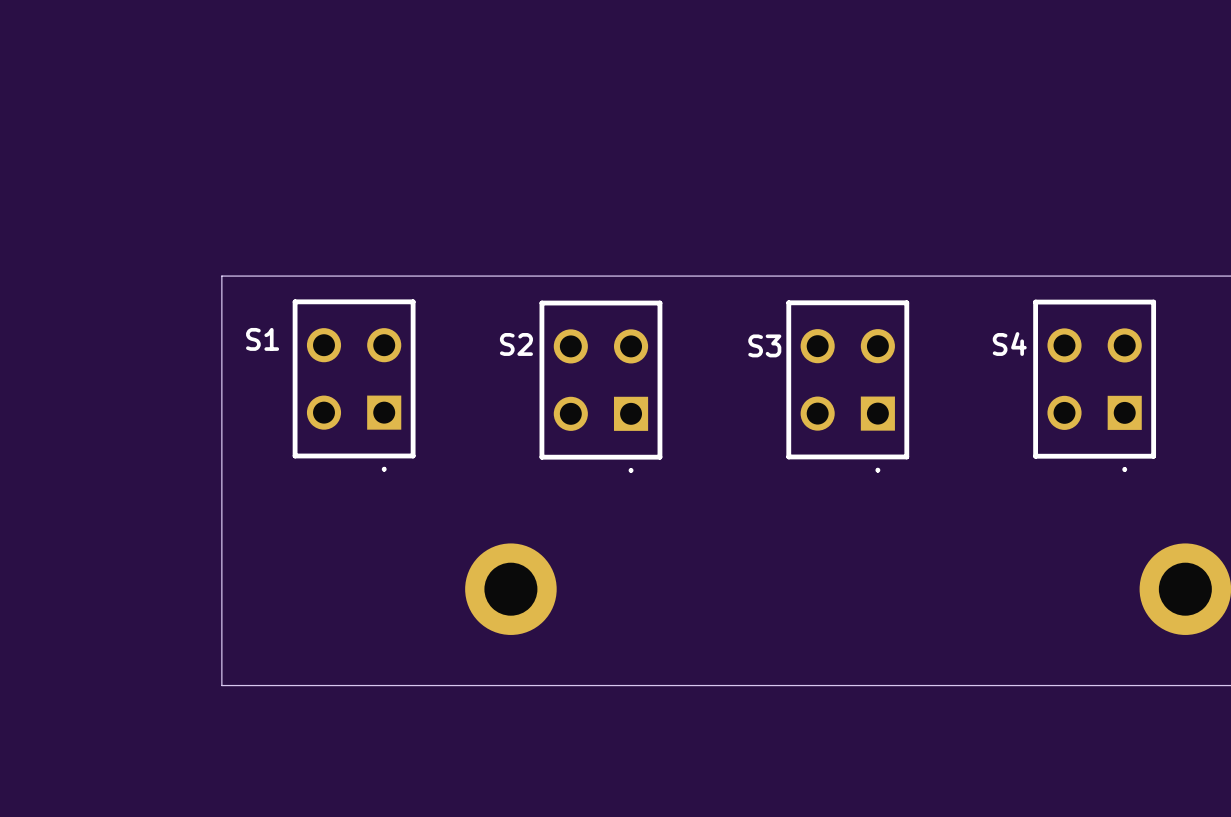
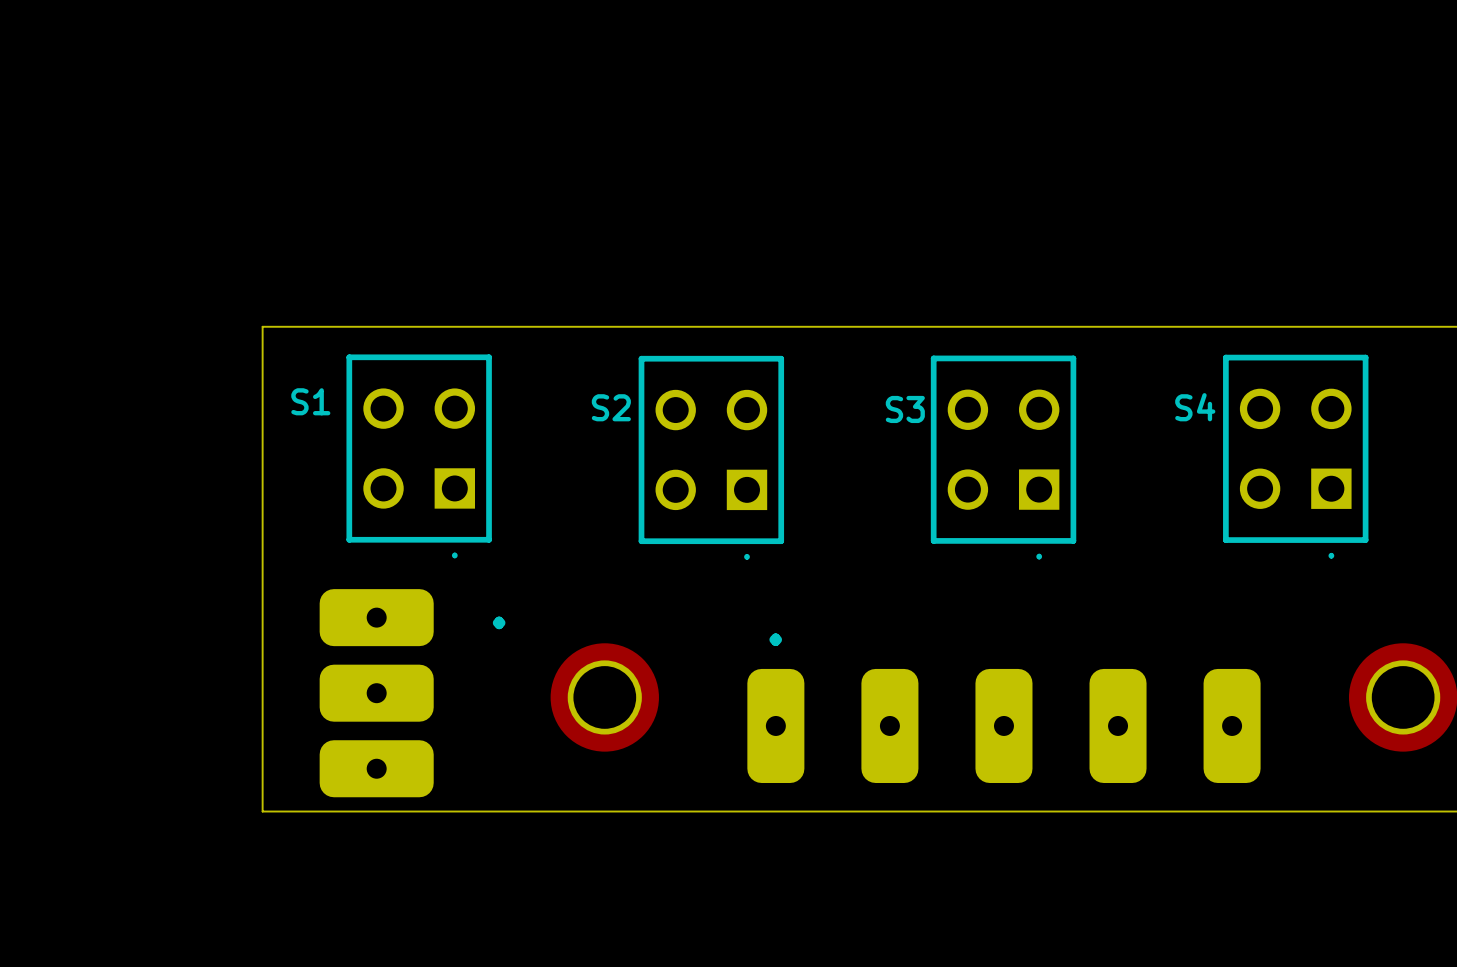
part: none -> (376, 617)
text: none -> . (499, 622)
text: none -> . (775, 639)
part: none -> (376, 693)
part: none -> (775, 725)
part: none -> (889, 725)
part: none -> (1003, 725)
part: none -> (1118, 725)
part: none -> (1232, 725)
part: none -> (376, 768)

